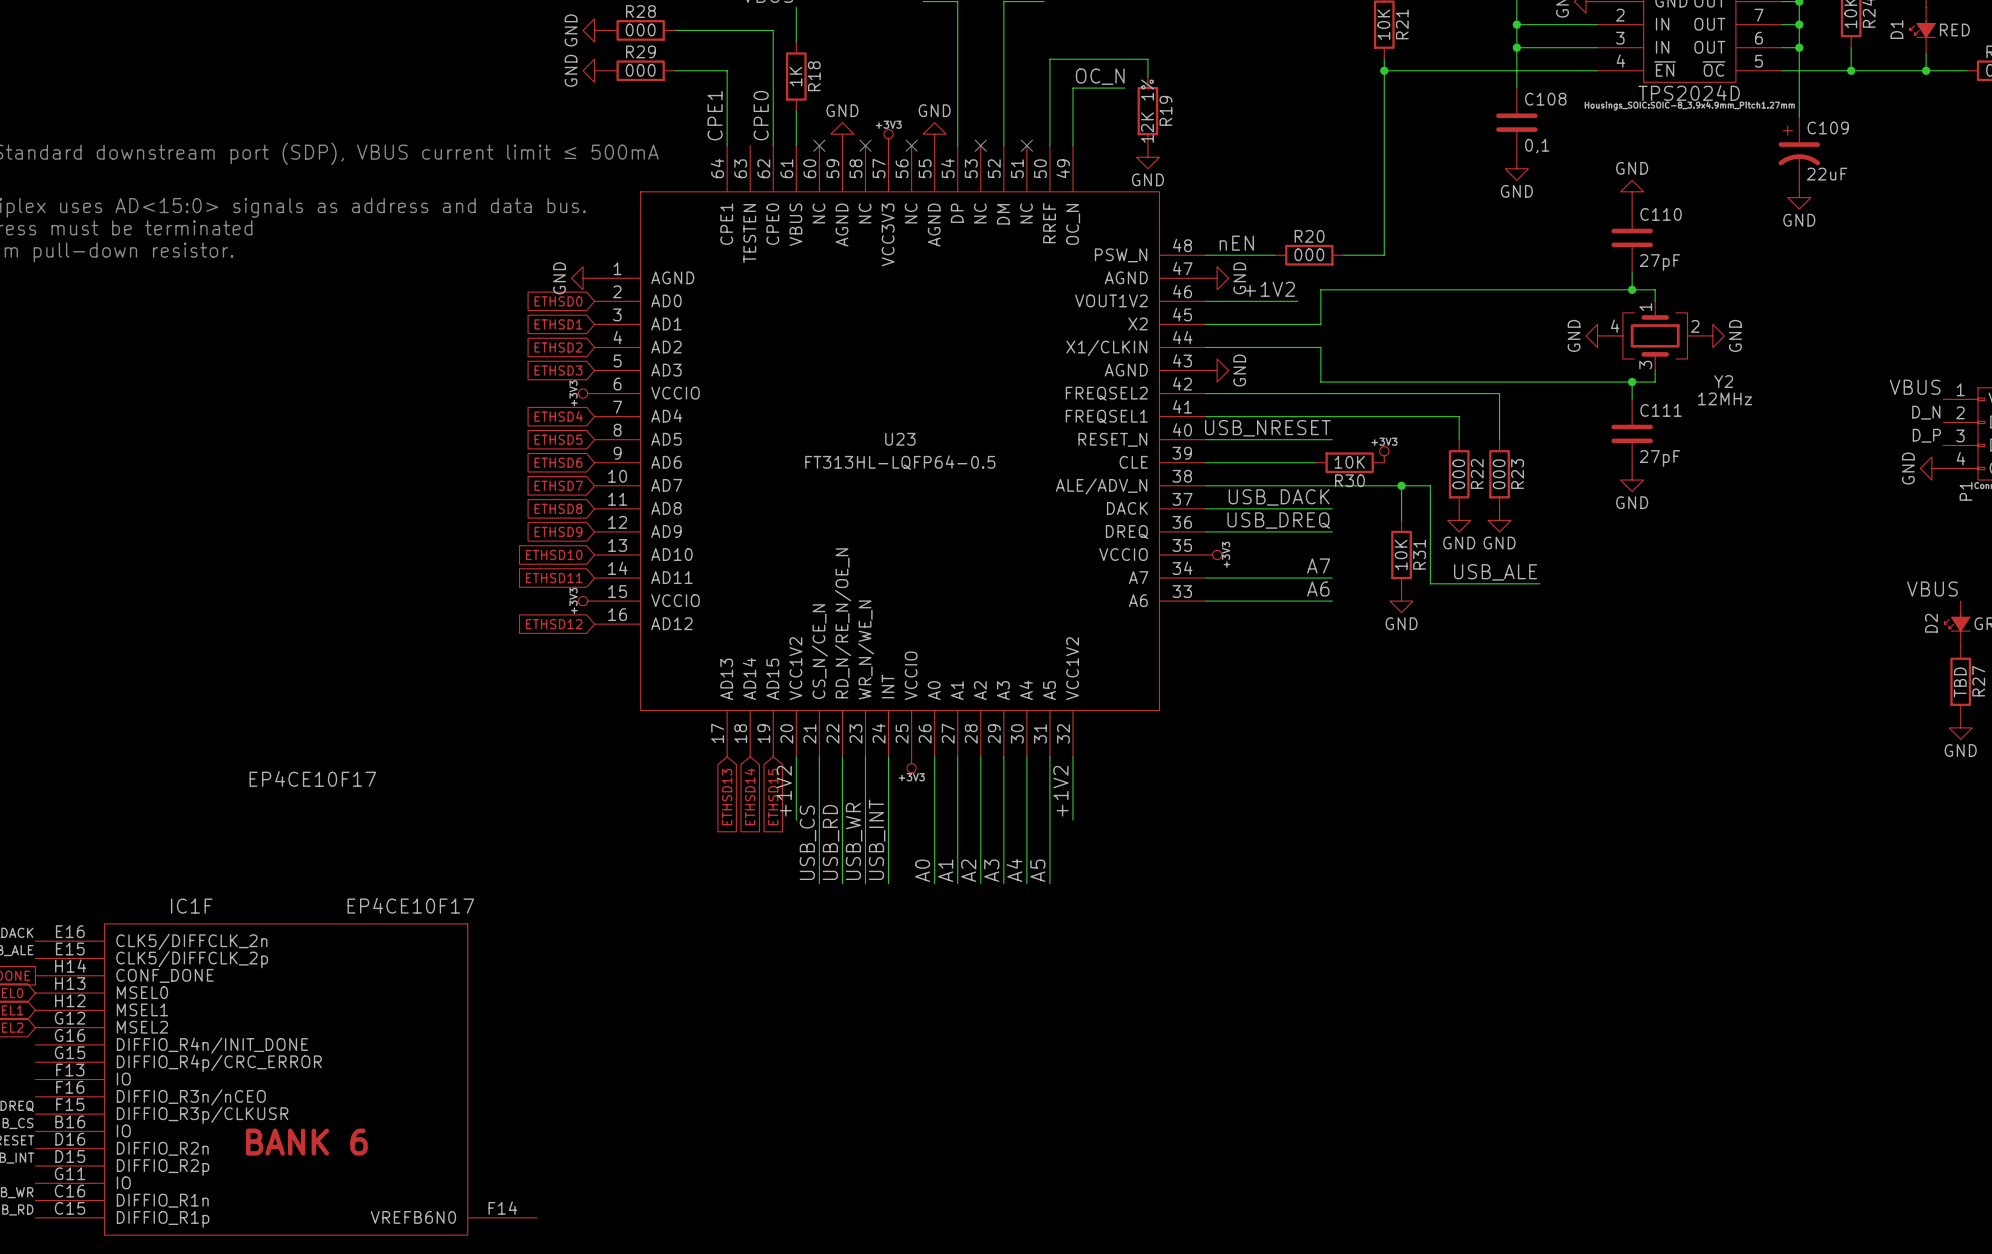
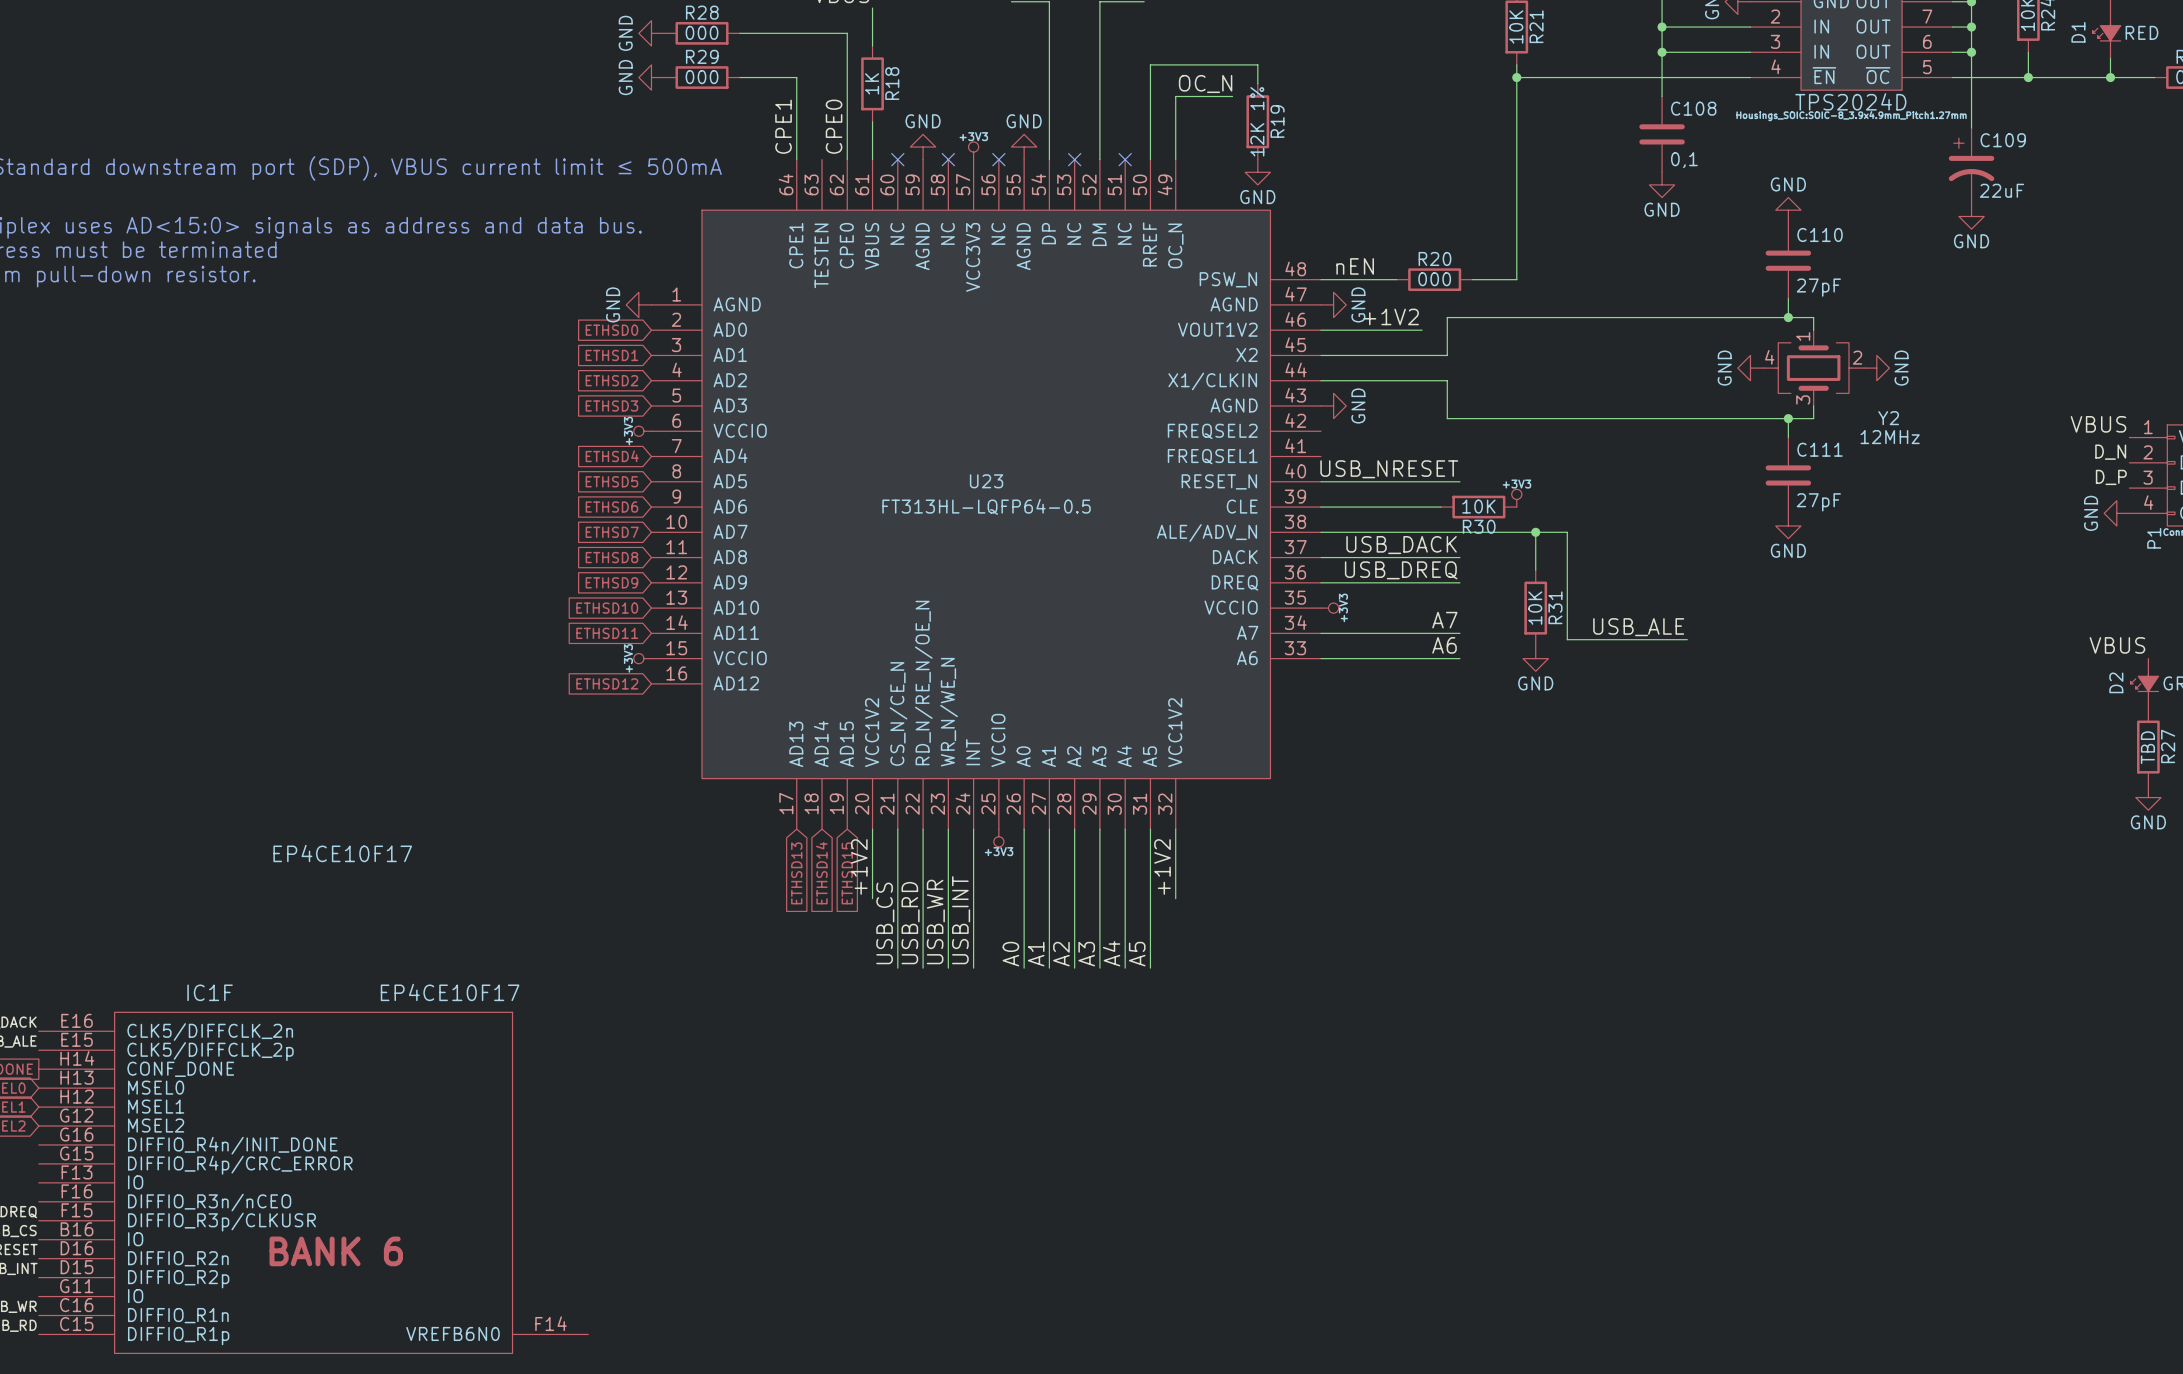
wire: (1205, 393) (1499, 393) (1499, 439) -> none
wire: (1205, 416) (1459, 416) (1459, 439) -> none
R22: 000 (1459, 474) -> none
R23: 000 (1499, 474) -> none
power symbol: GND (1459, 520) -> none
power symbol: GND (1499, 520) -> none

